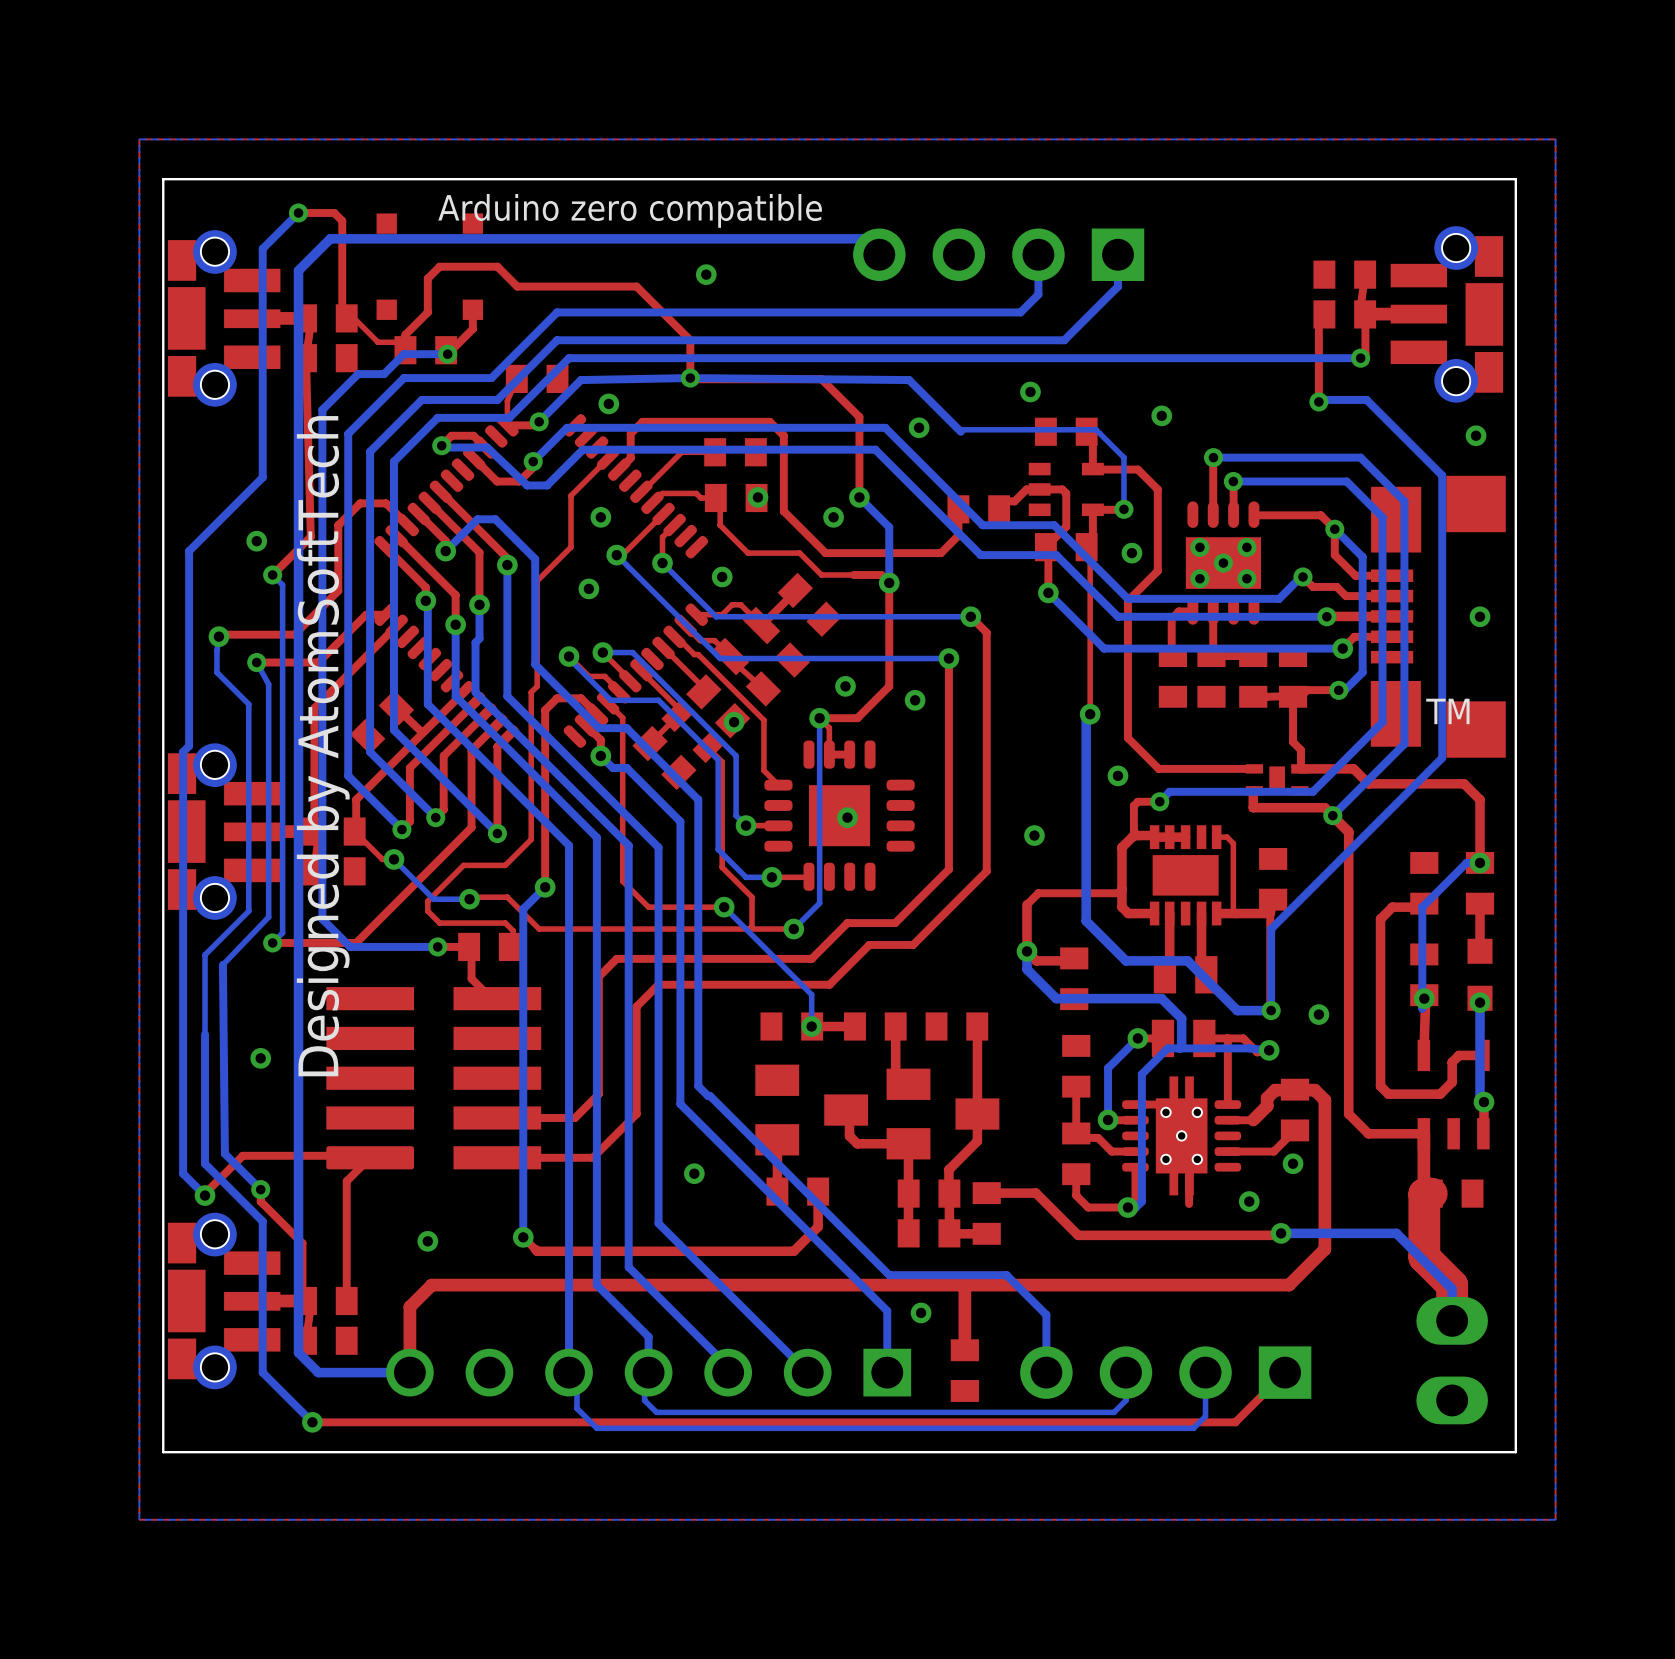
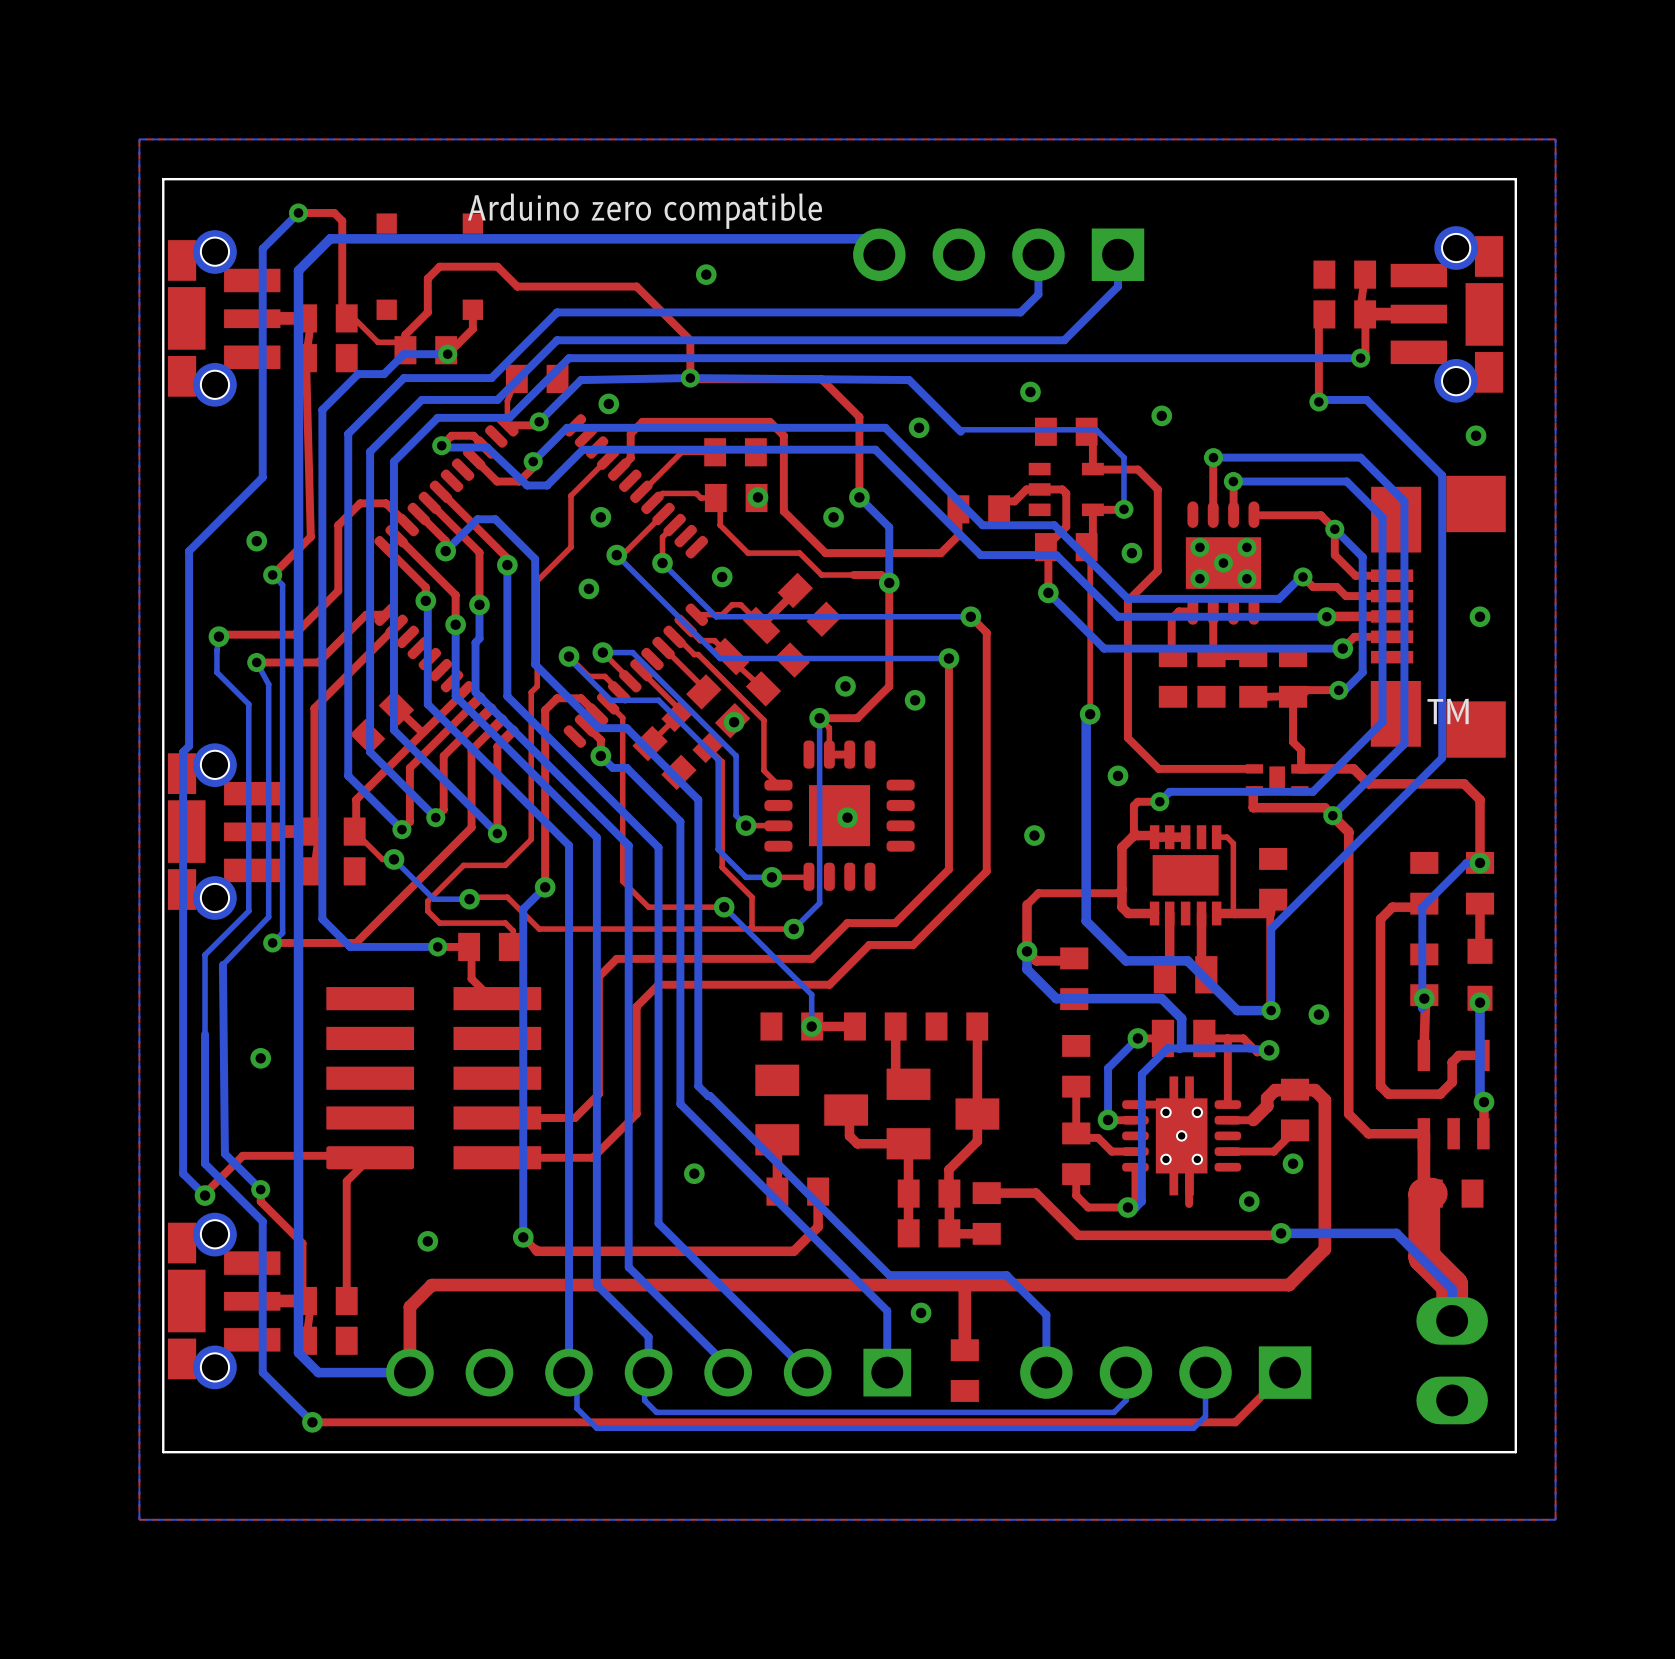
text: Designed by AtomSoftTech (323, 746) -> none

